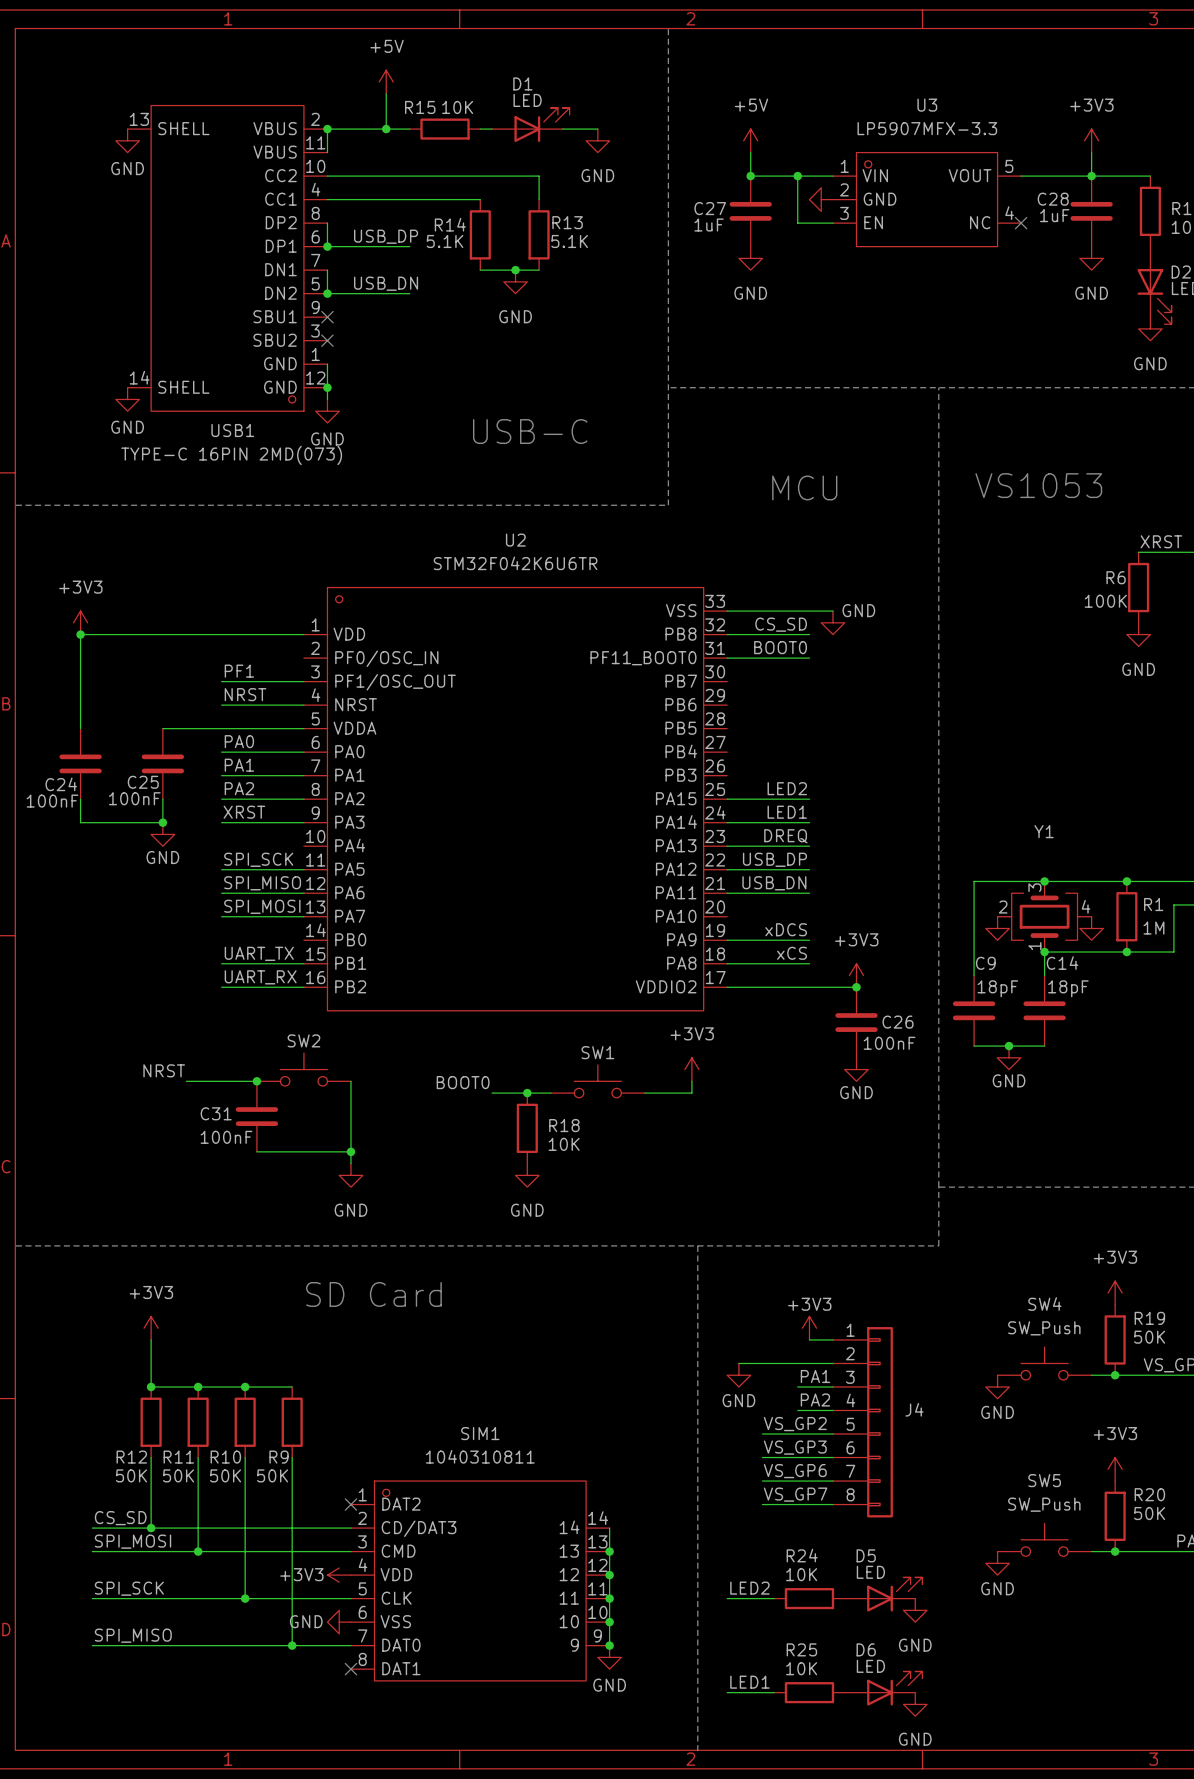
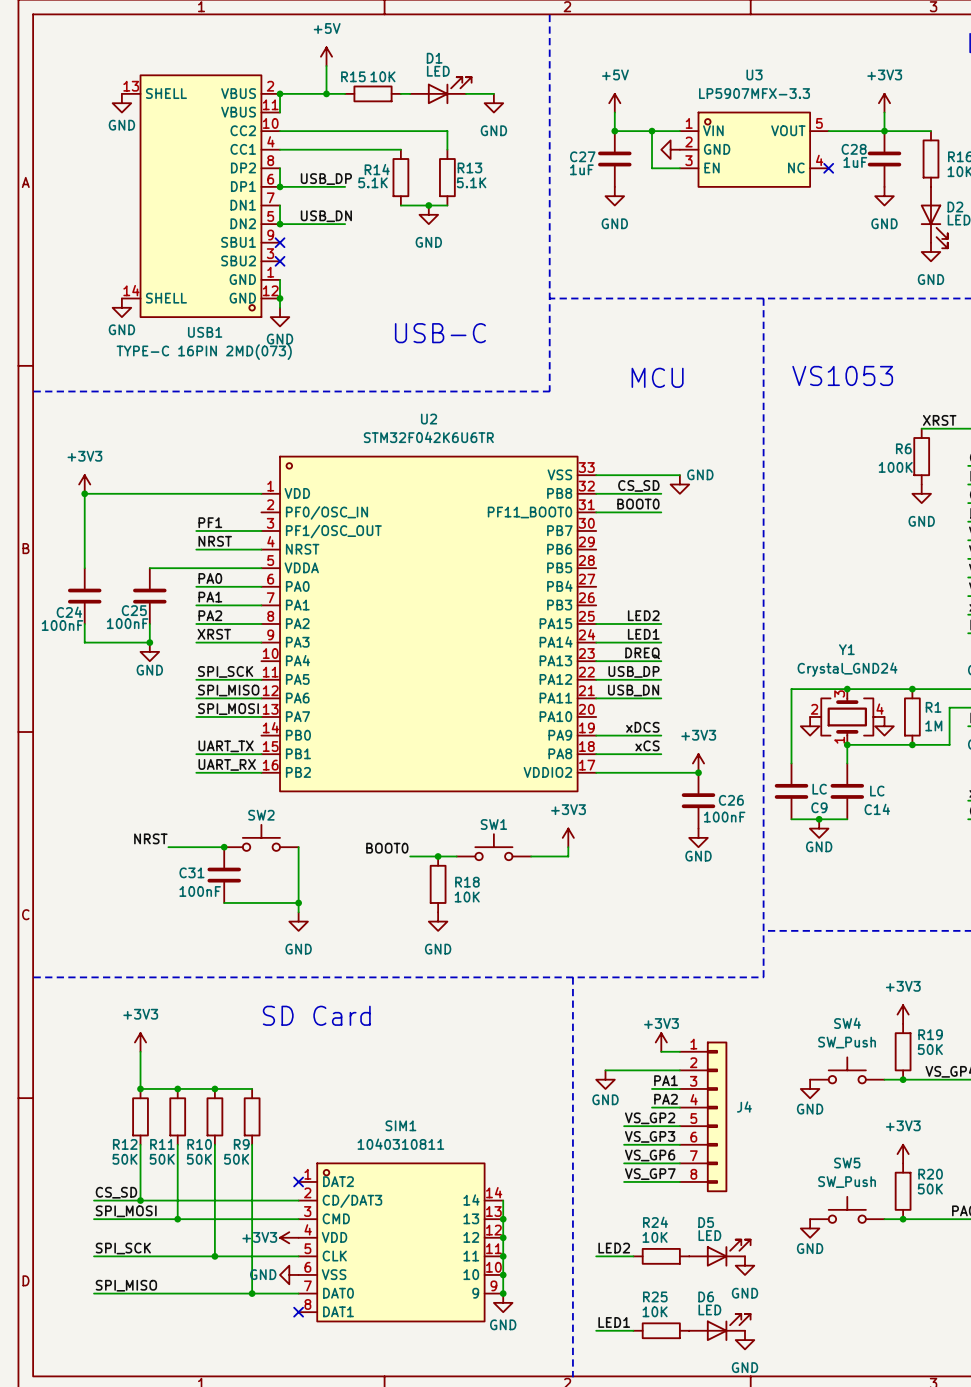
Y1 value: none -> Crystal_GND24 (847, 669)
C9 name position: C9 (985, 963) -> C9 (819, 807)
C14 name position: C14 (1062, 963) -> C14 (877, 809)
C9 value: 18pF (997, 988) -> LC (819, 789)
C14 value: 18pF (1068, 988) -> LC (877, 791)

